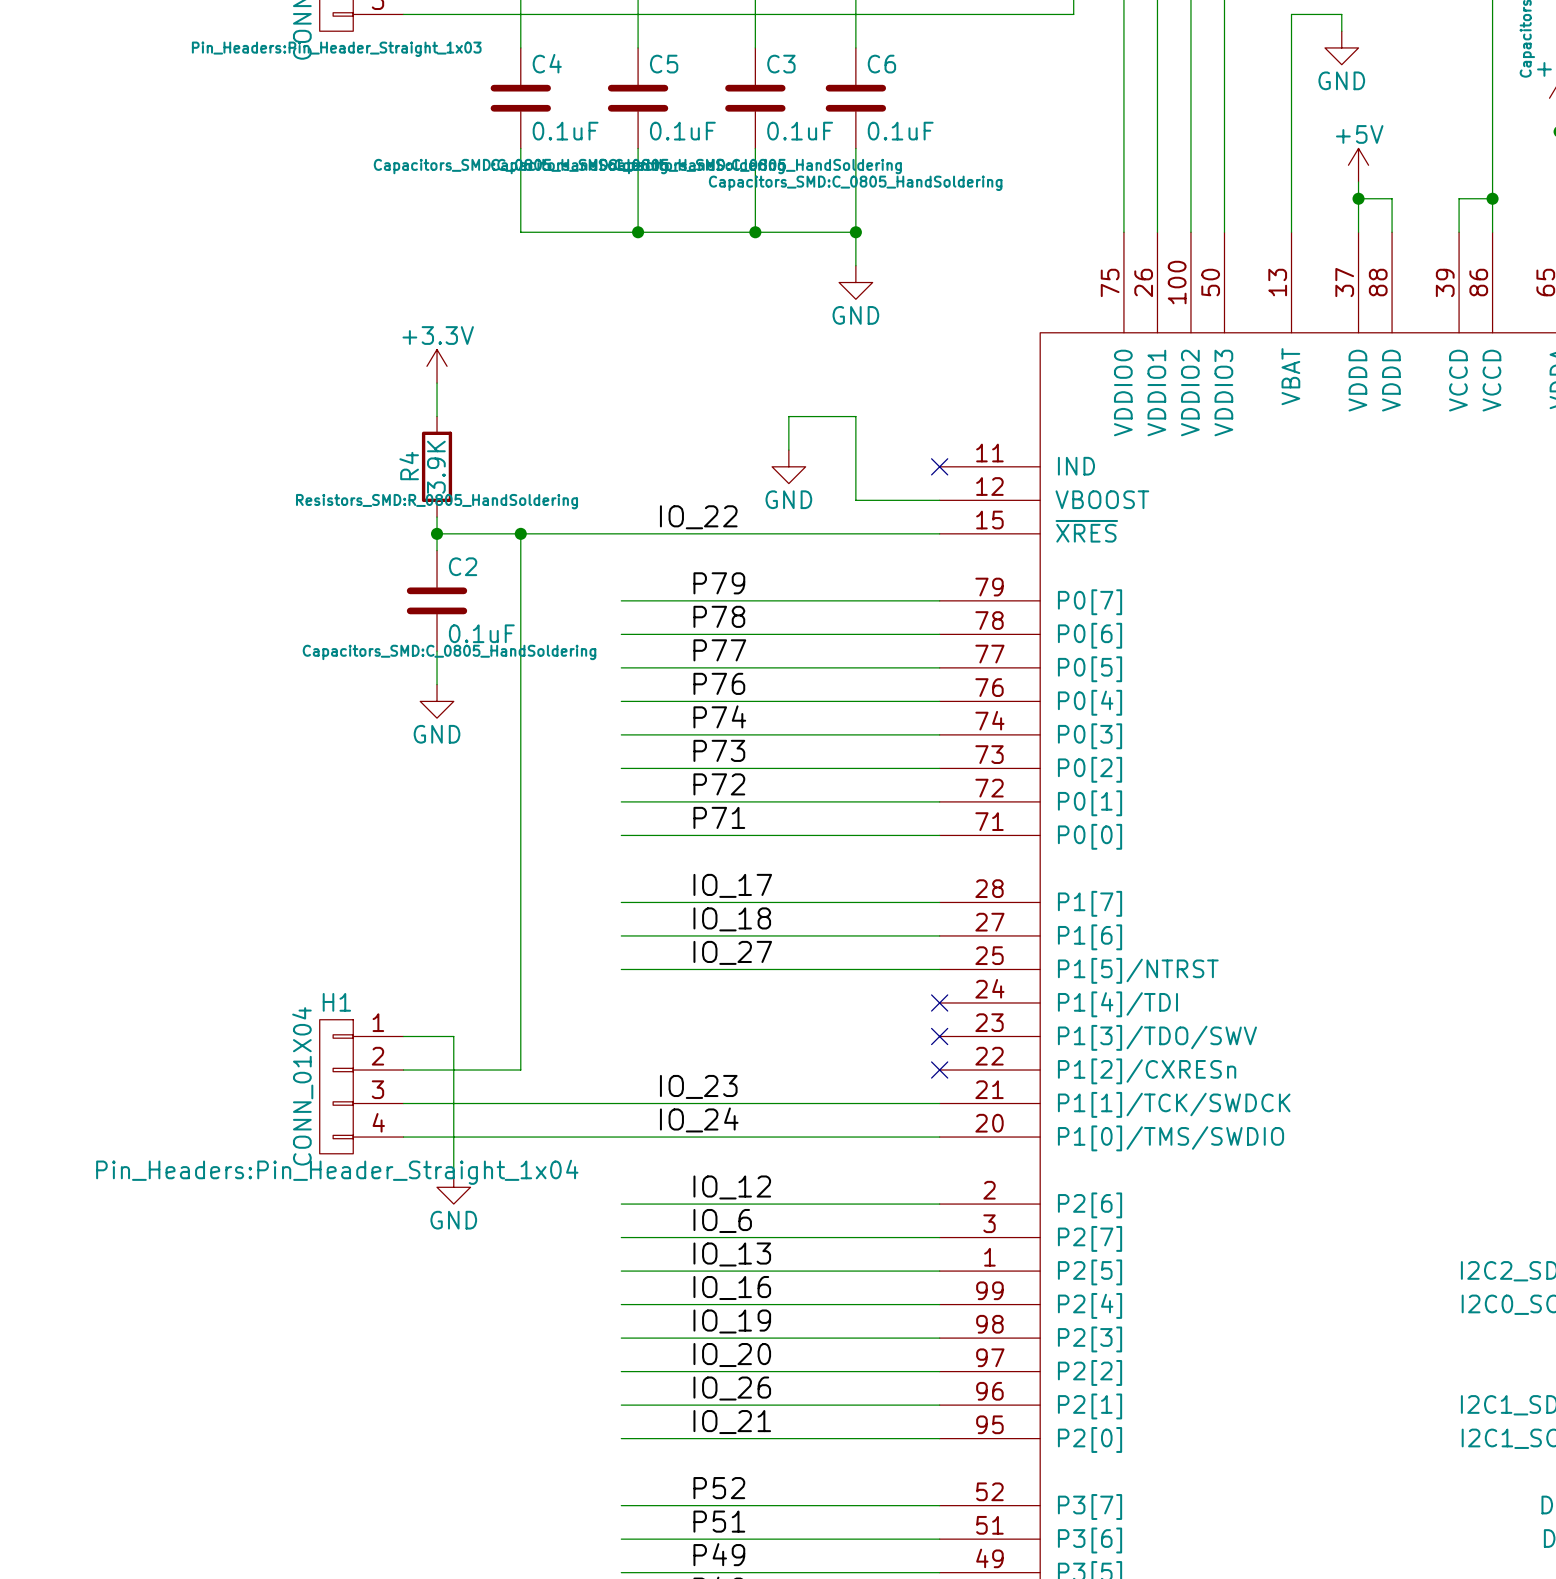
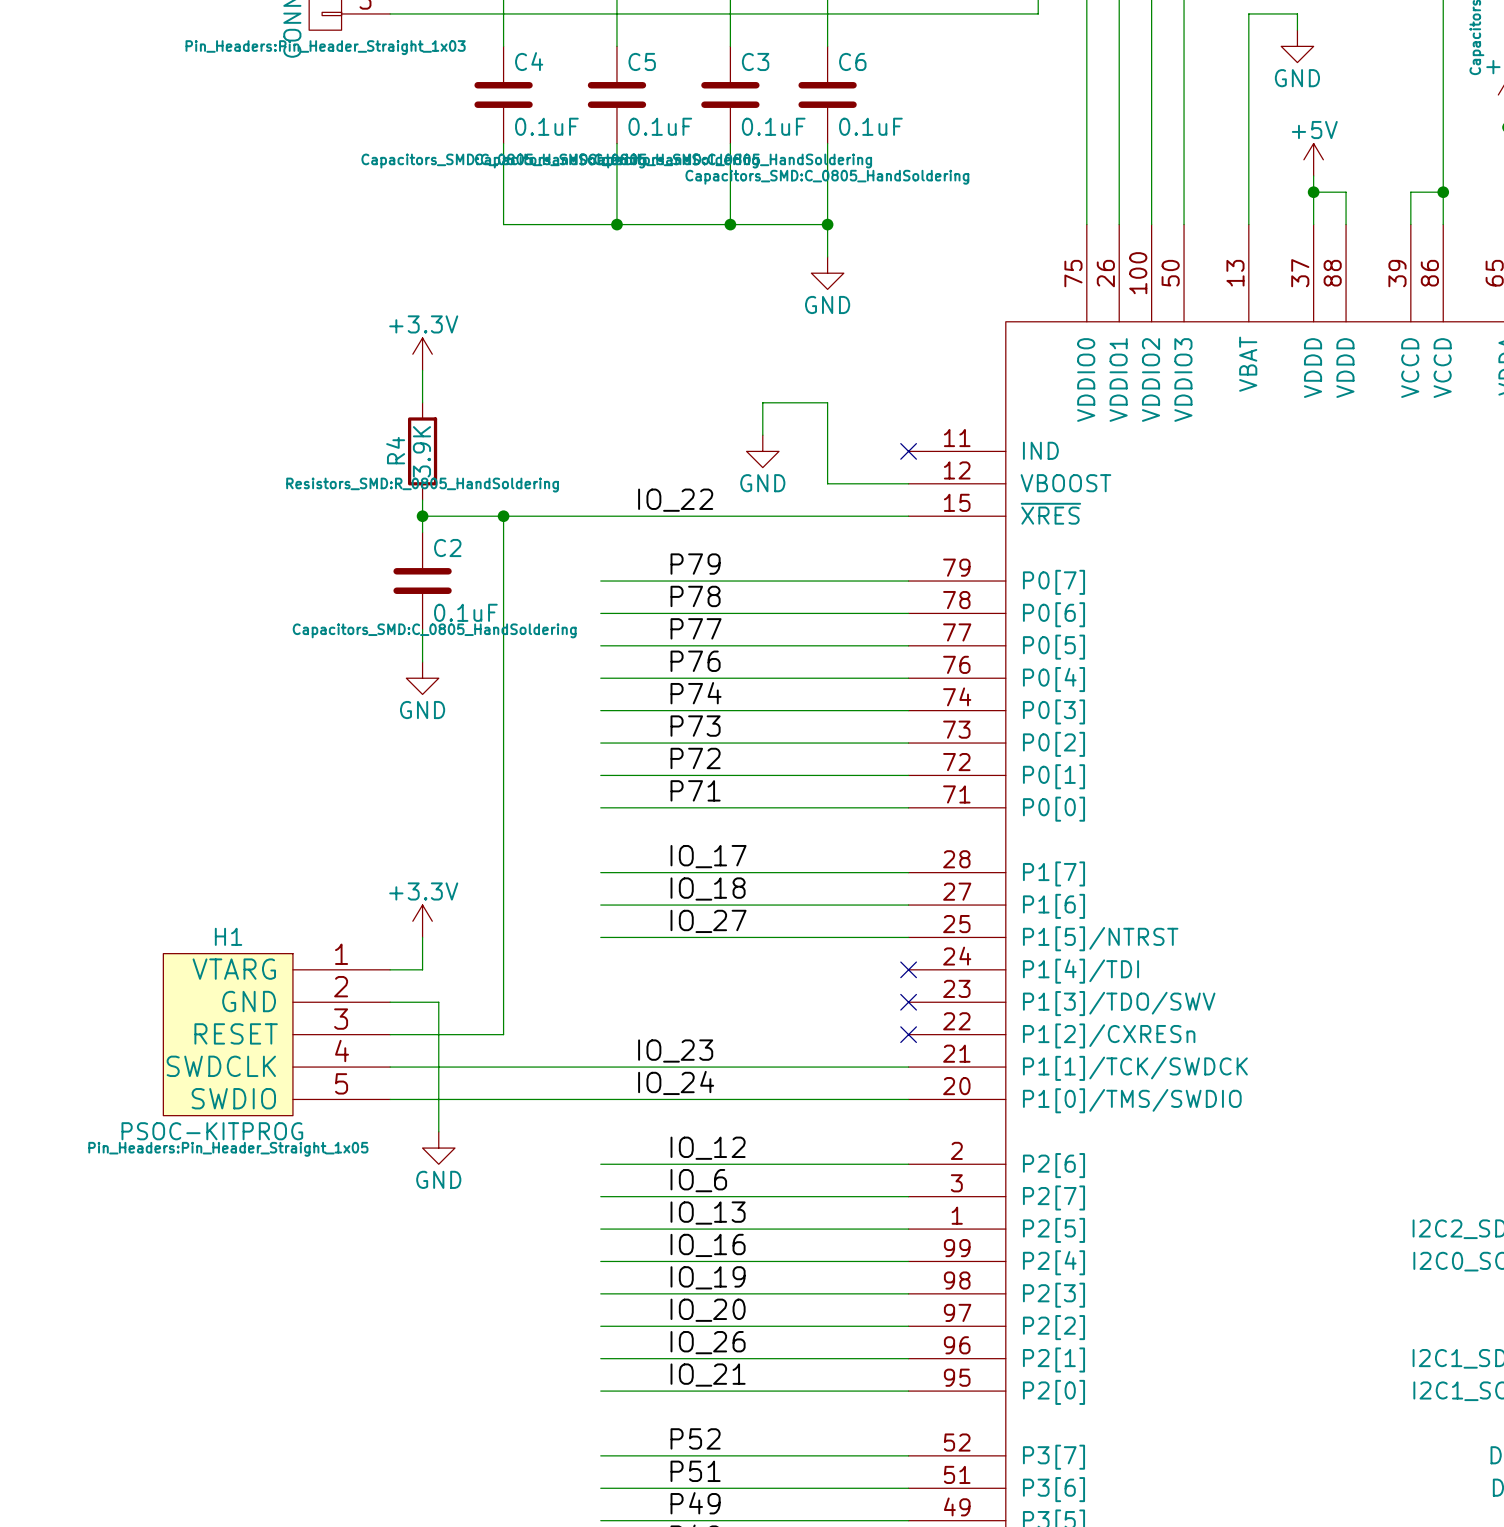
power symbol: none -> +3.3V (422, 921)
wire: none -> (422, 937) (422, 969) (390, 969)
H1 name position: H1 (336, 1002) -> H1 (228, 936)
H1 symbol: [319, 1019, 404, 1154] -> [163, 953, 391, 1116]
H1 value: CONN_01X04 (302, 1086) -> PSOC-KITPROG (212, 1131)
H1 text: Pin_Headers:Pin_Header_Straight_1x04 (337, 1172) -> Pin_Headers:Pin_Header_Straight_1x05 (228, 1149)

